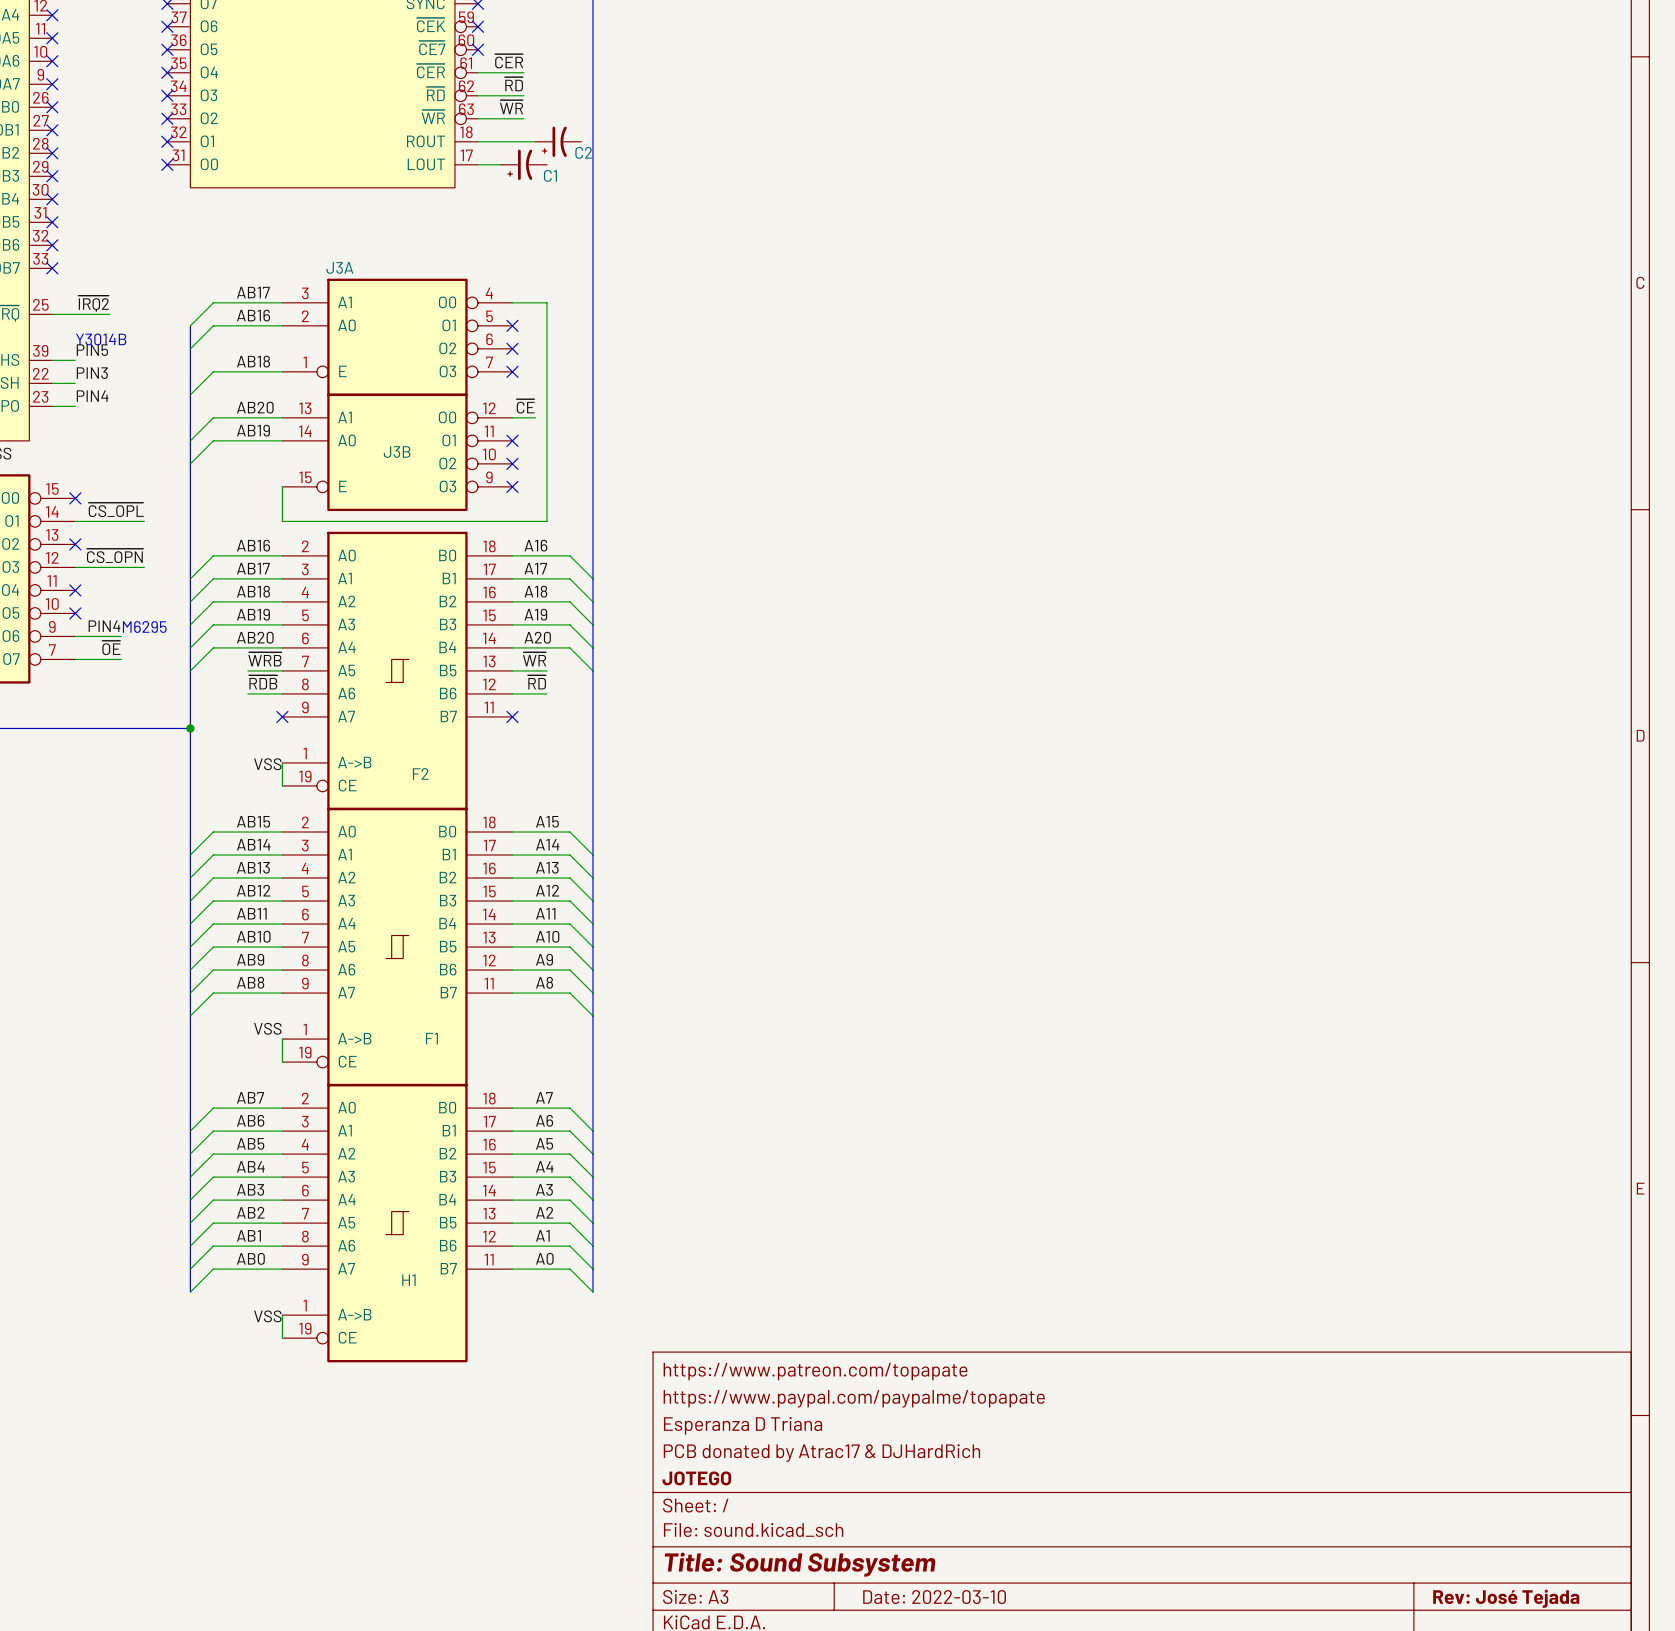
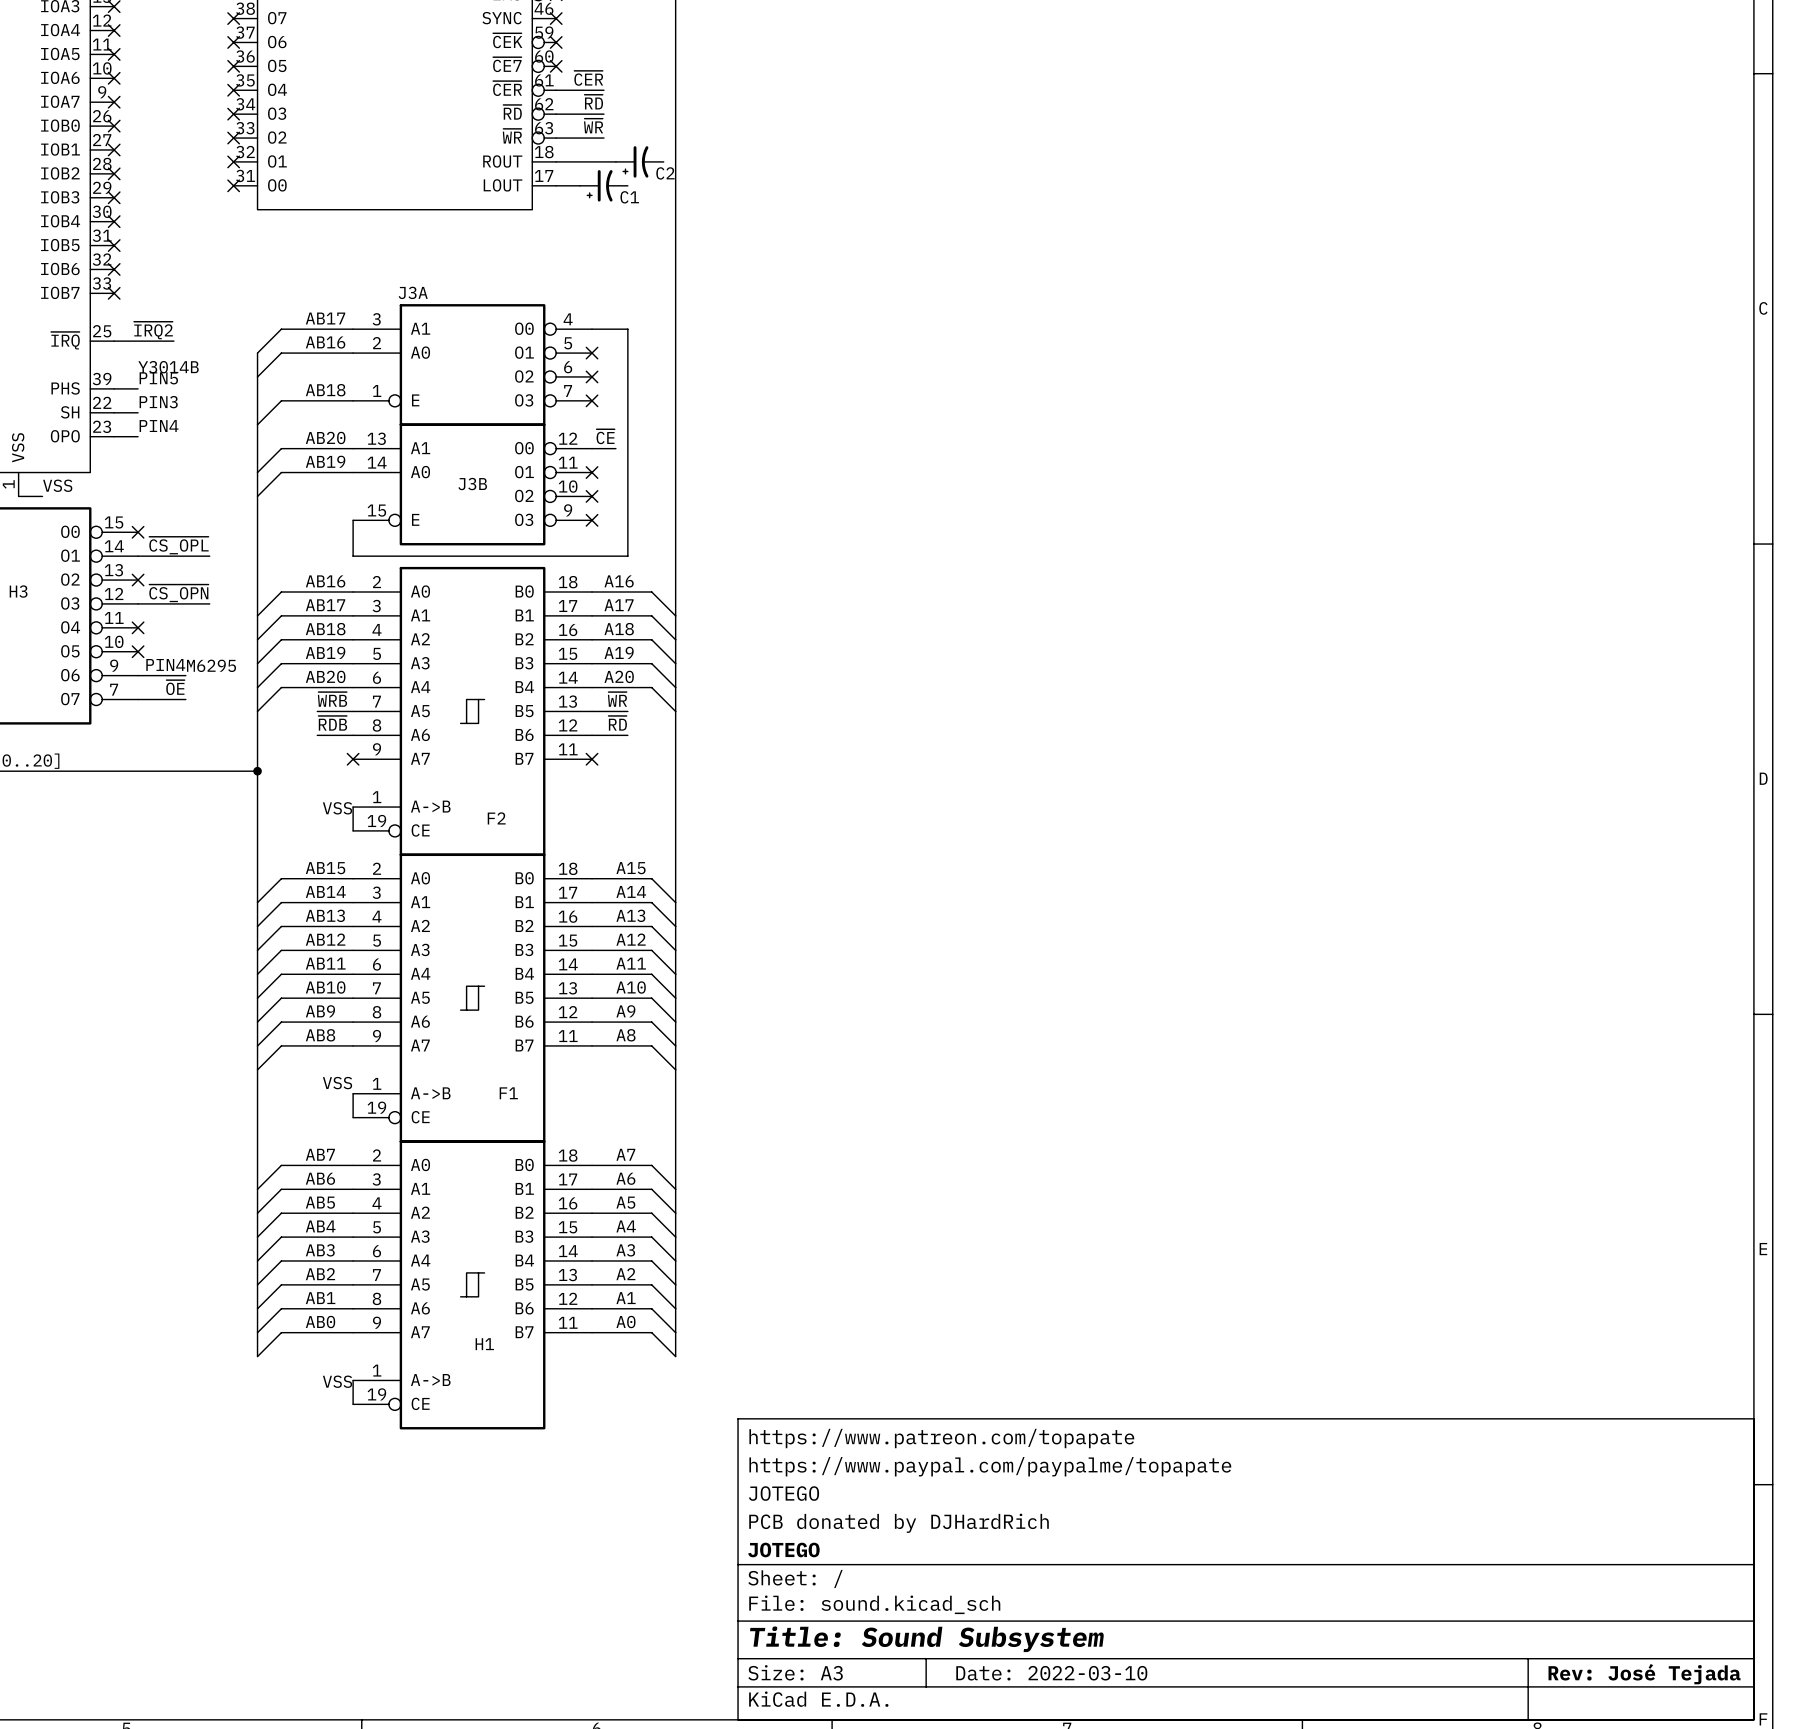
title block: Esperanza D Triana (742, 1425) -> JOTEGO (784, 1493)
title block: PCB donated by Atrac17 & DJHardRich (821, 1453) -> PCB donated by DJHardRich (899, 1523)

